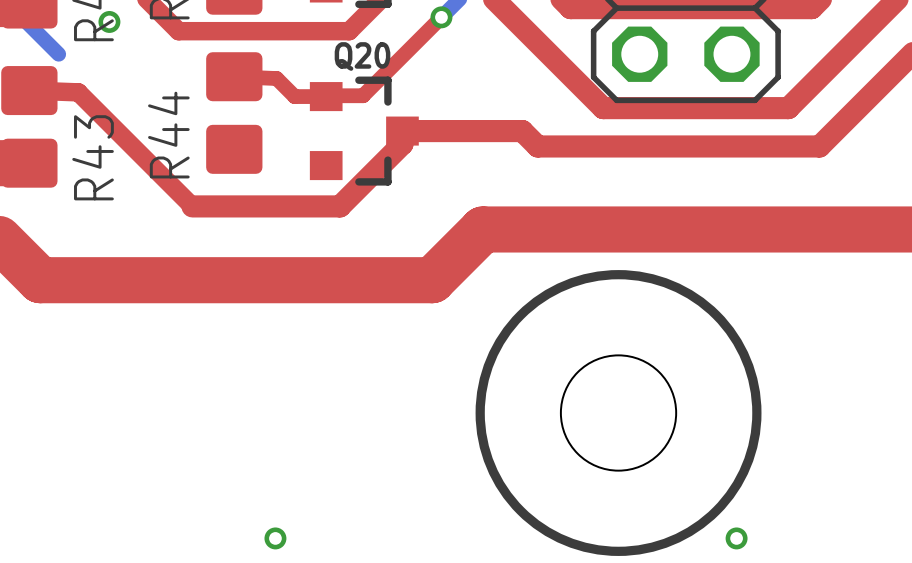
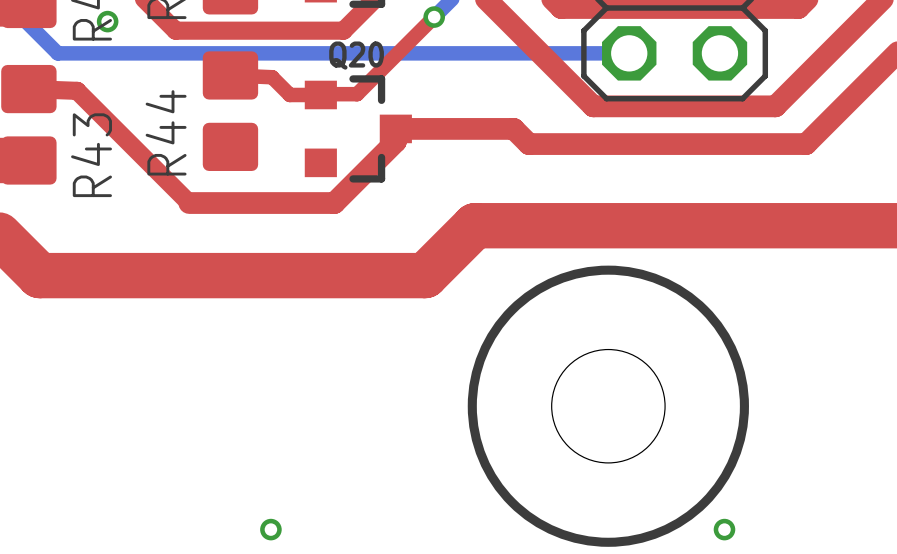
bottom track: none -> (57, 53) (629, 53)

